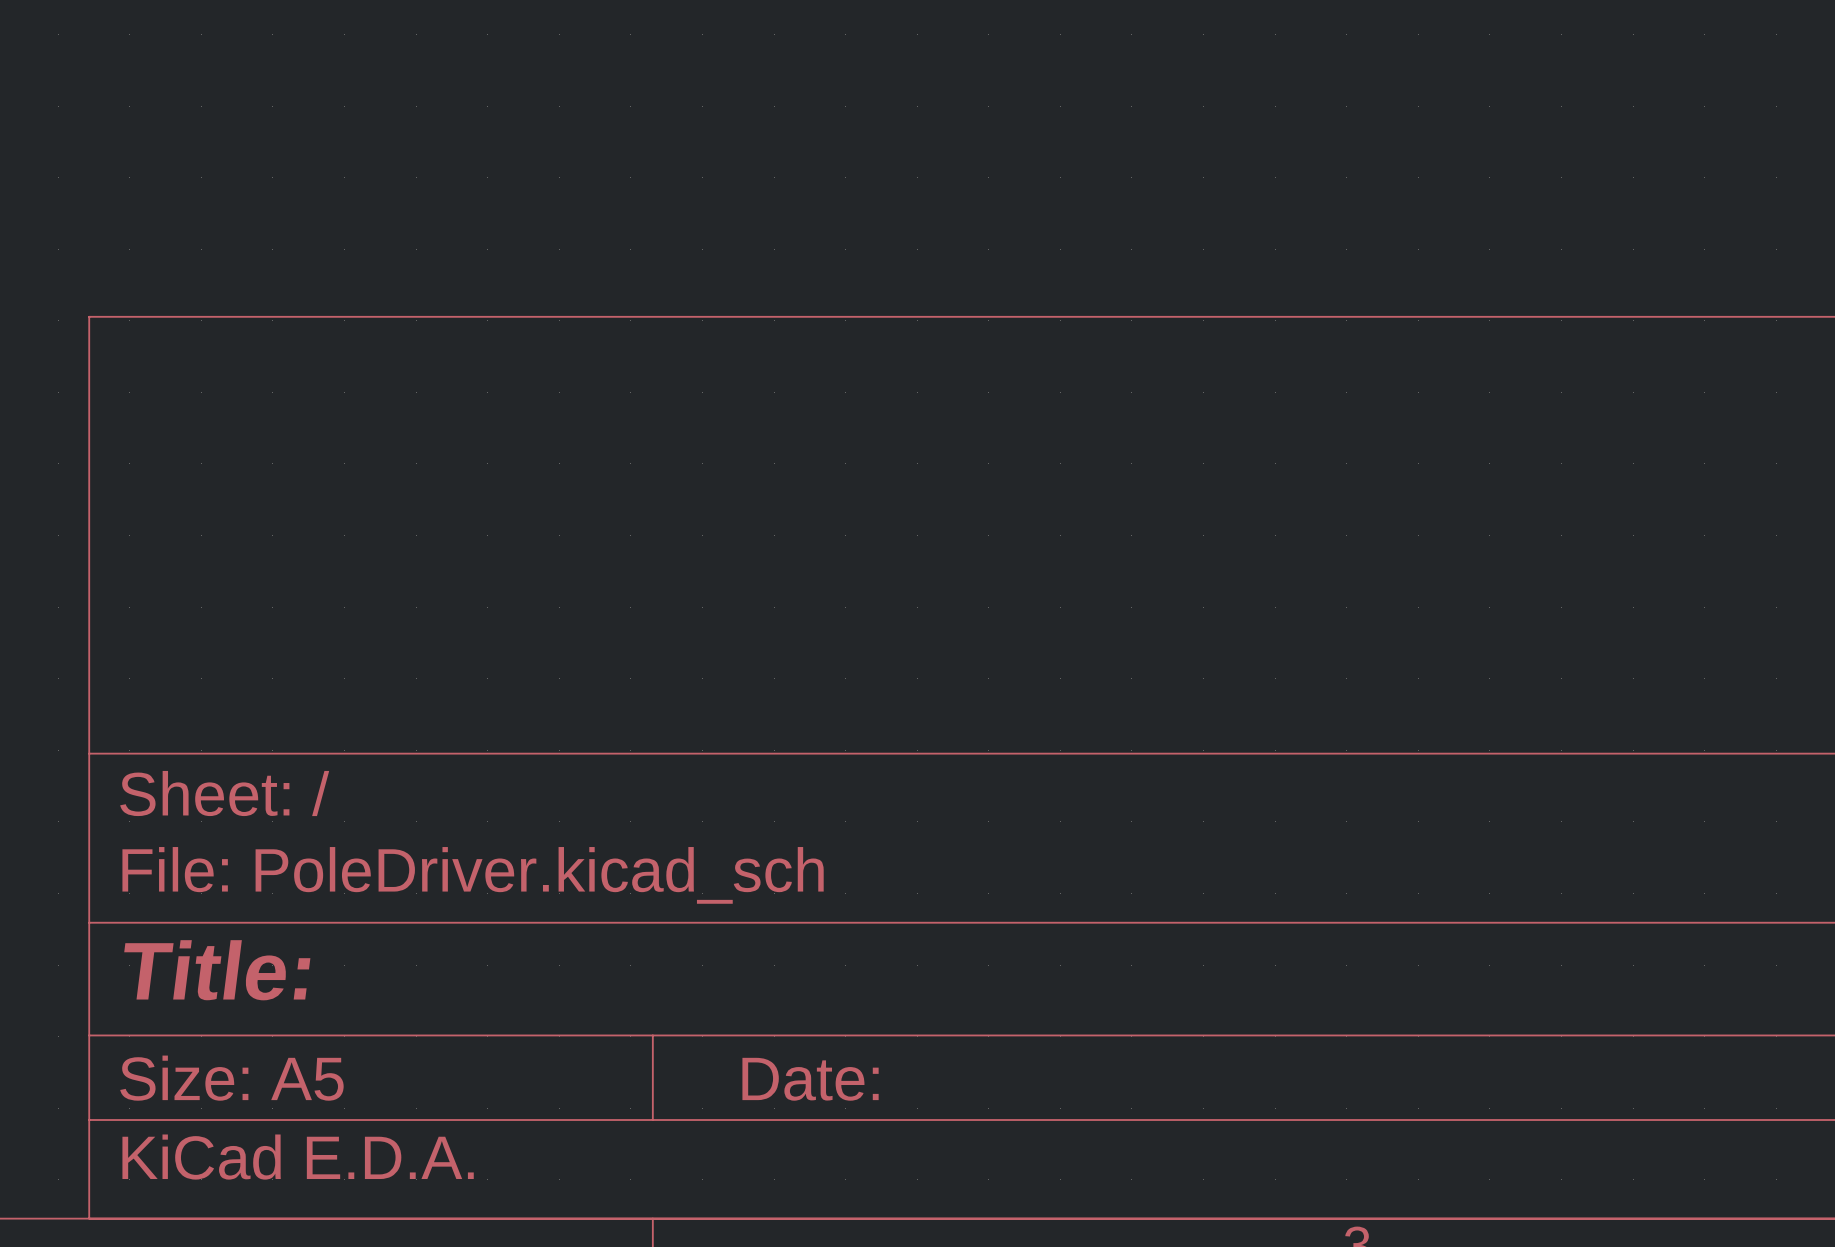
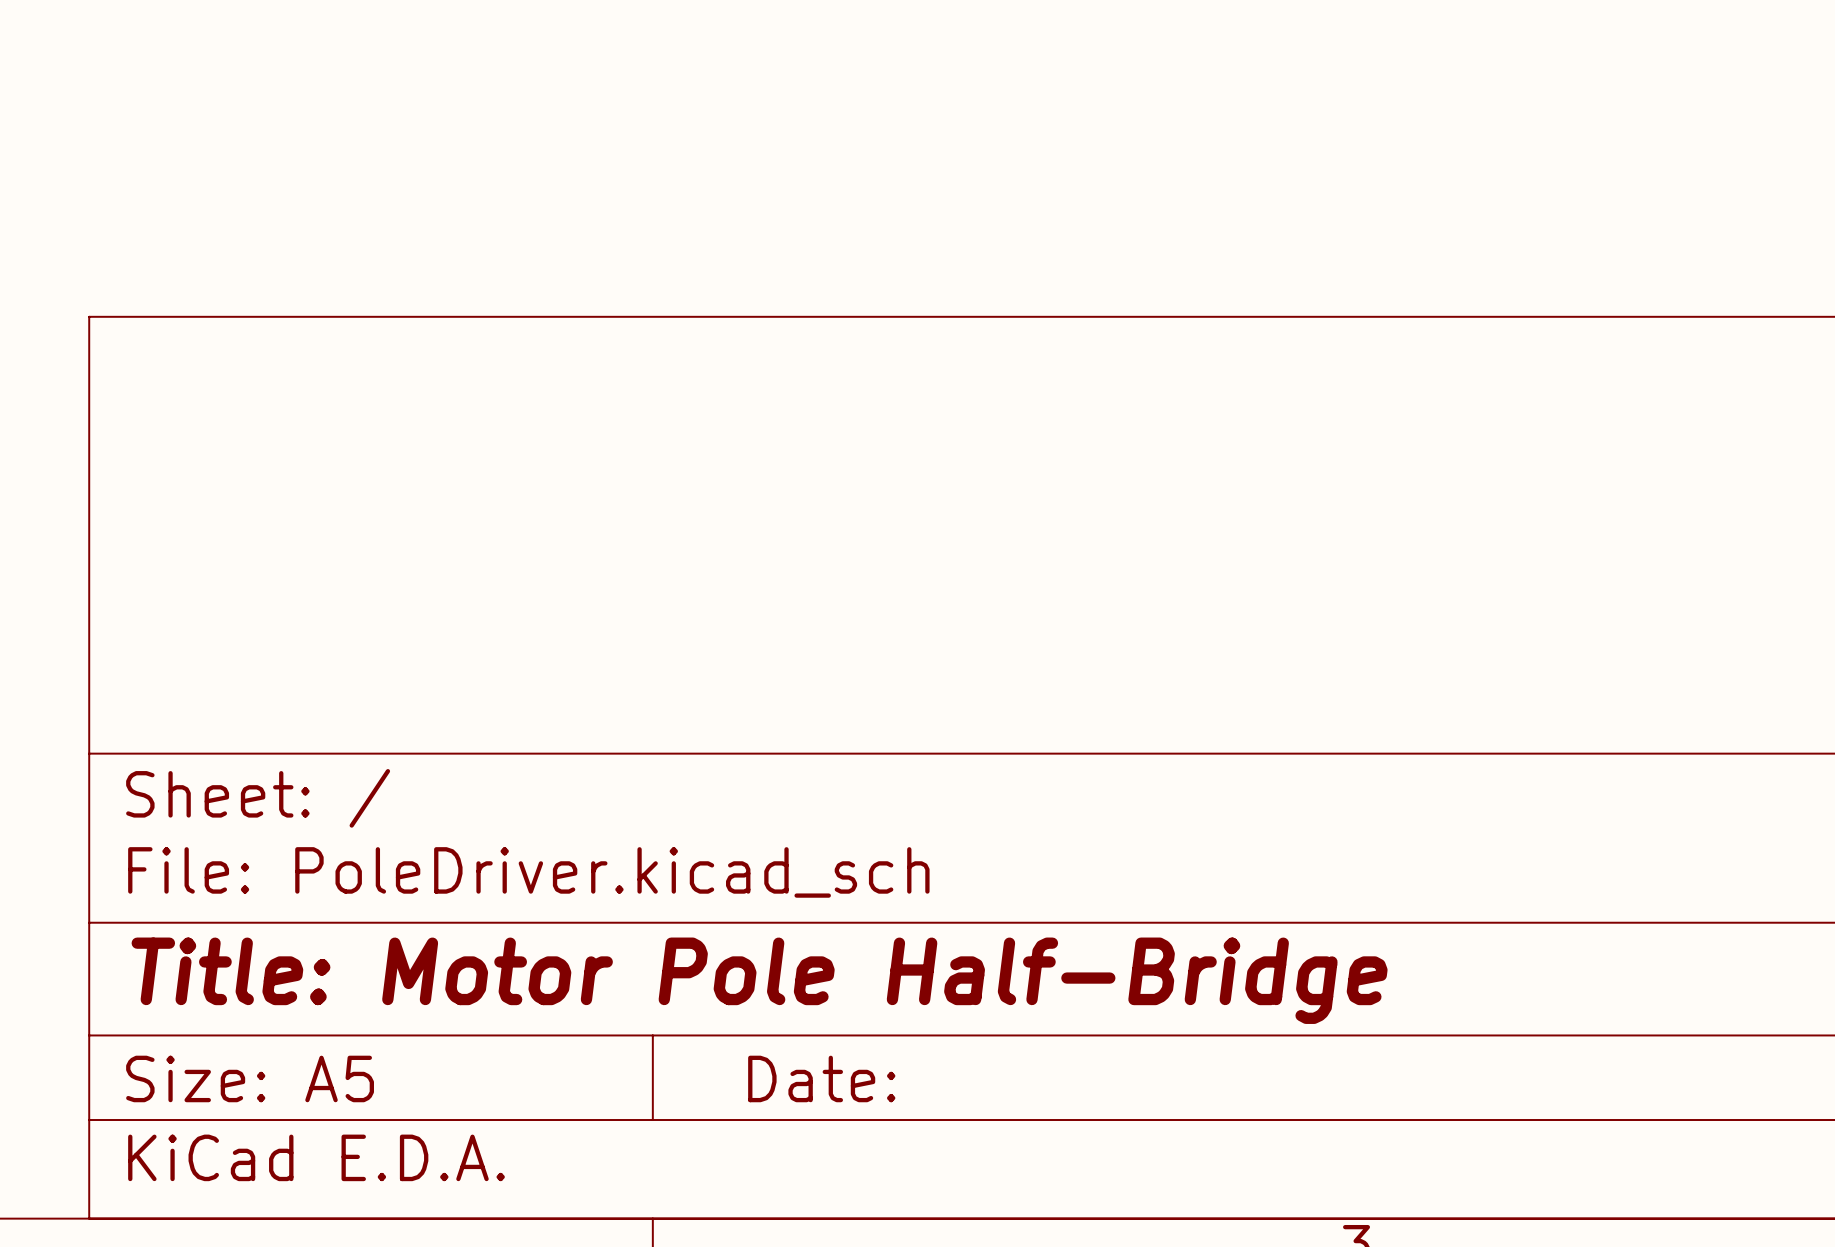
title block: Title: (217, 970) -> Title: Motor Pole Half-Bridge (759, 980)

